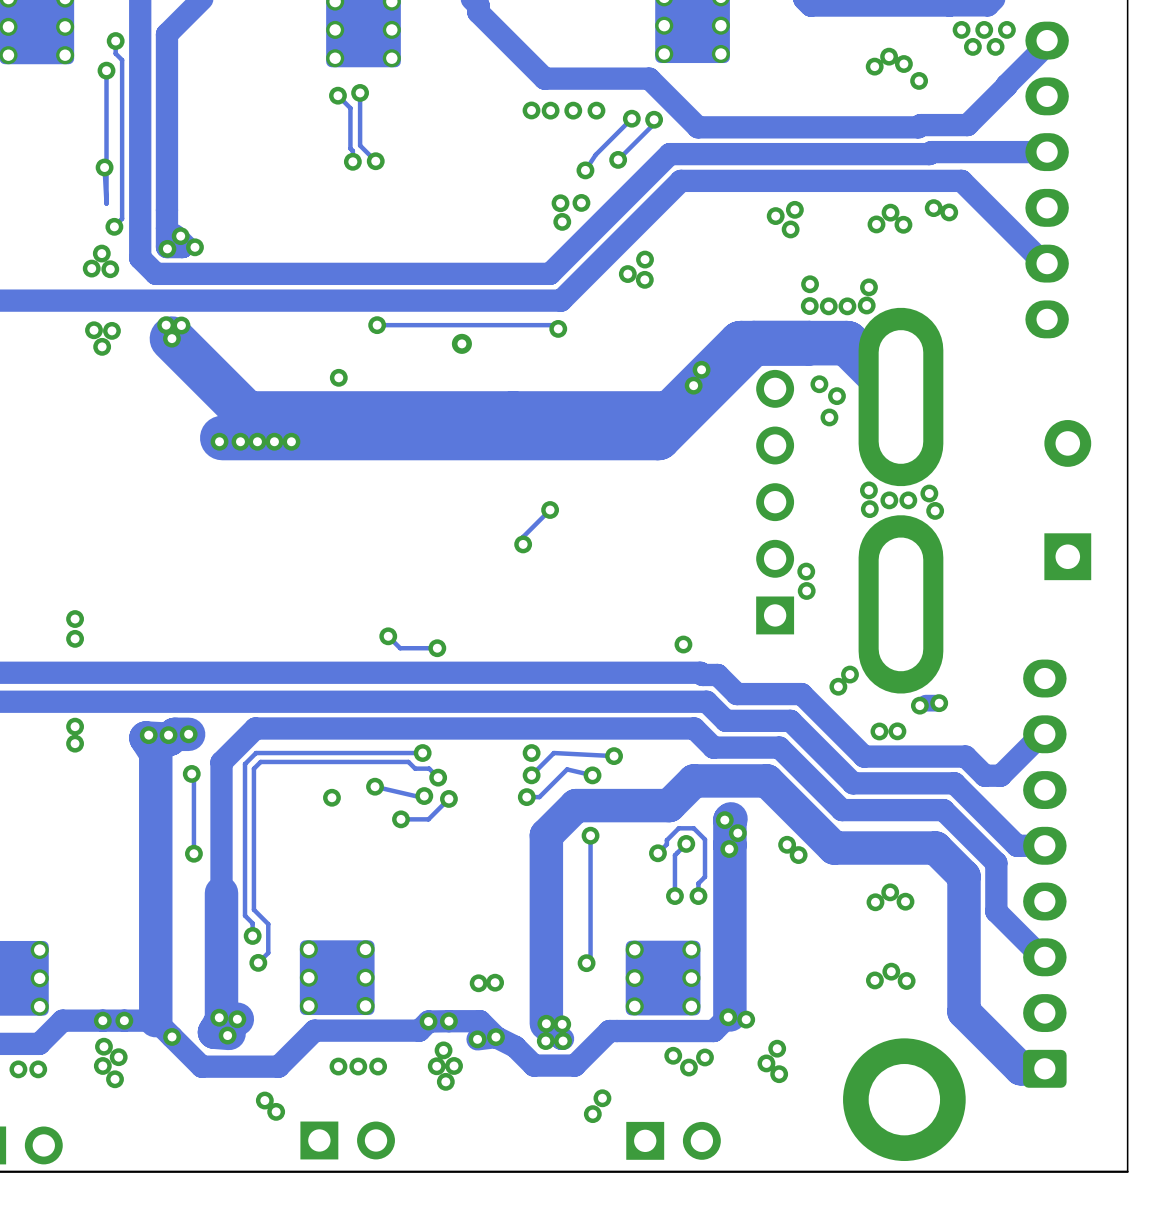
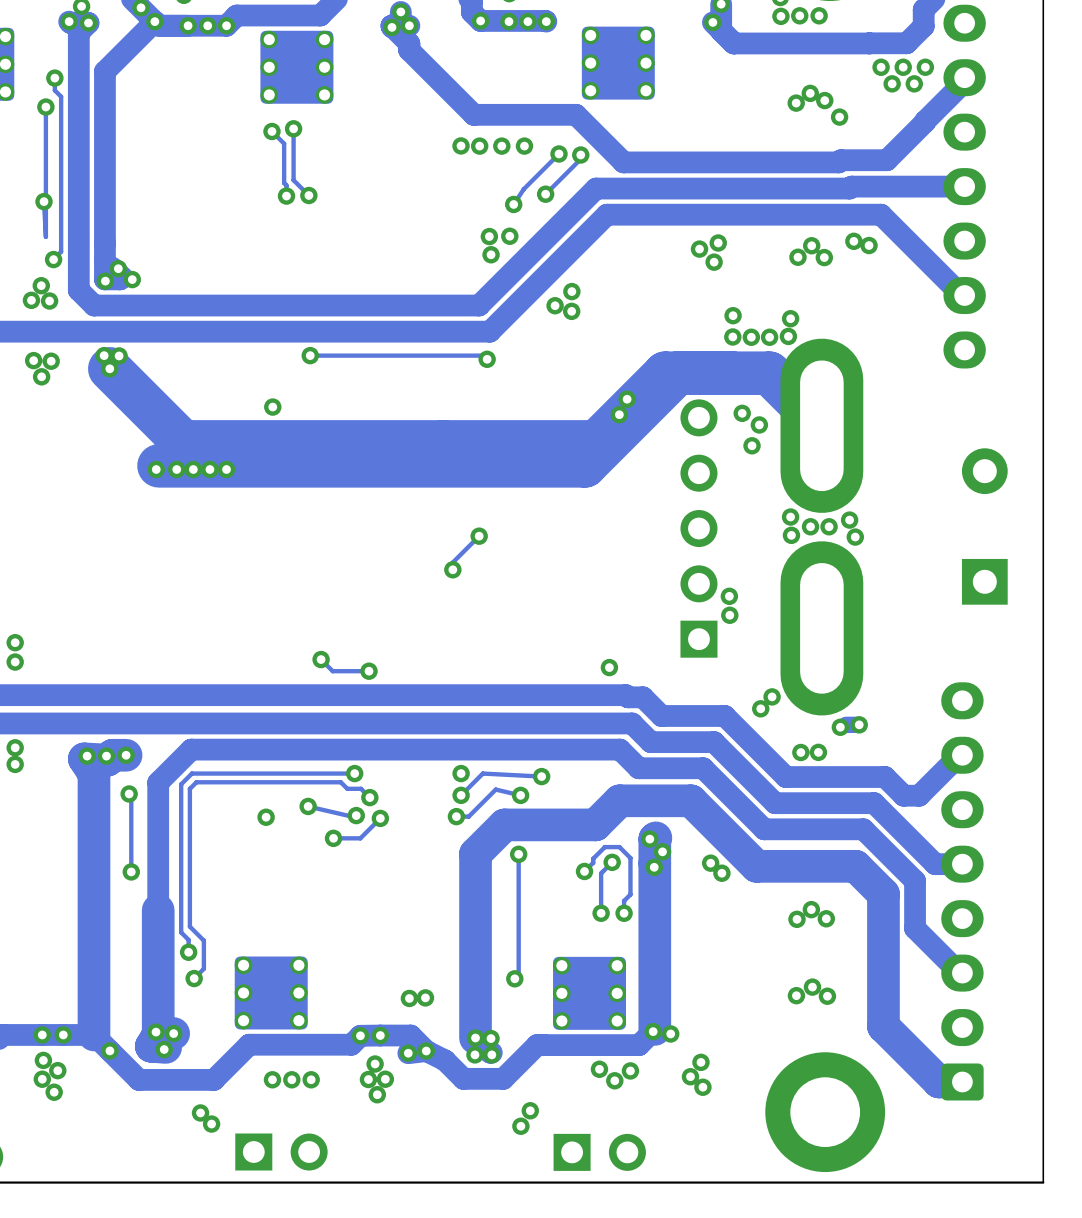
via: (461, 343) -> none

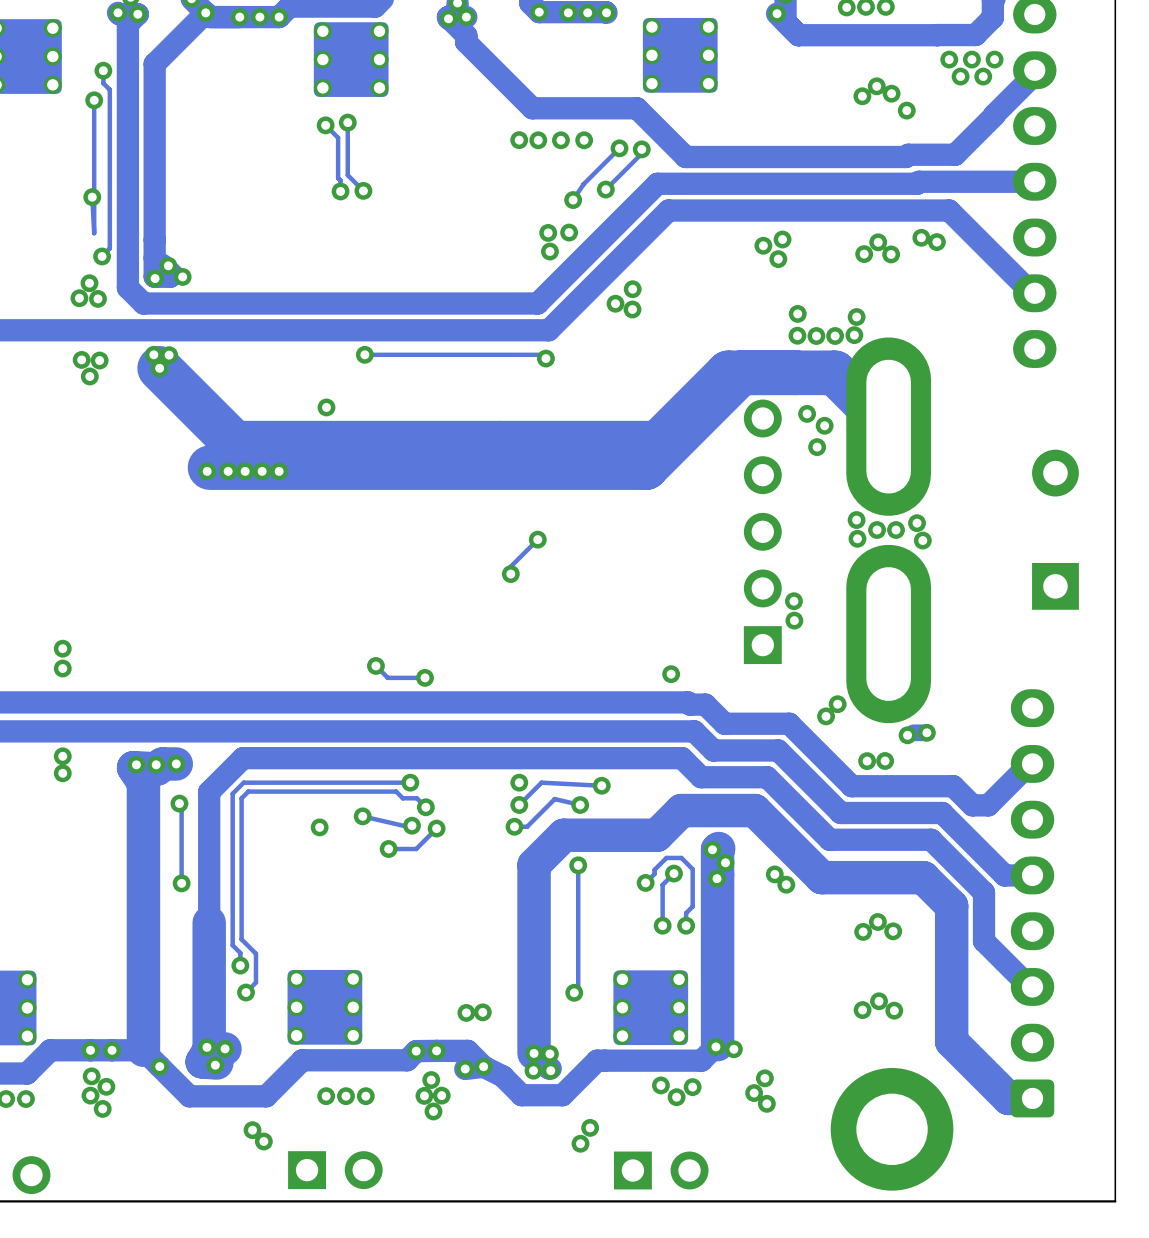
via: (627, 399) -> none
via: (619, 414) -> none

